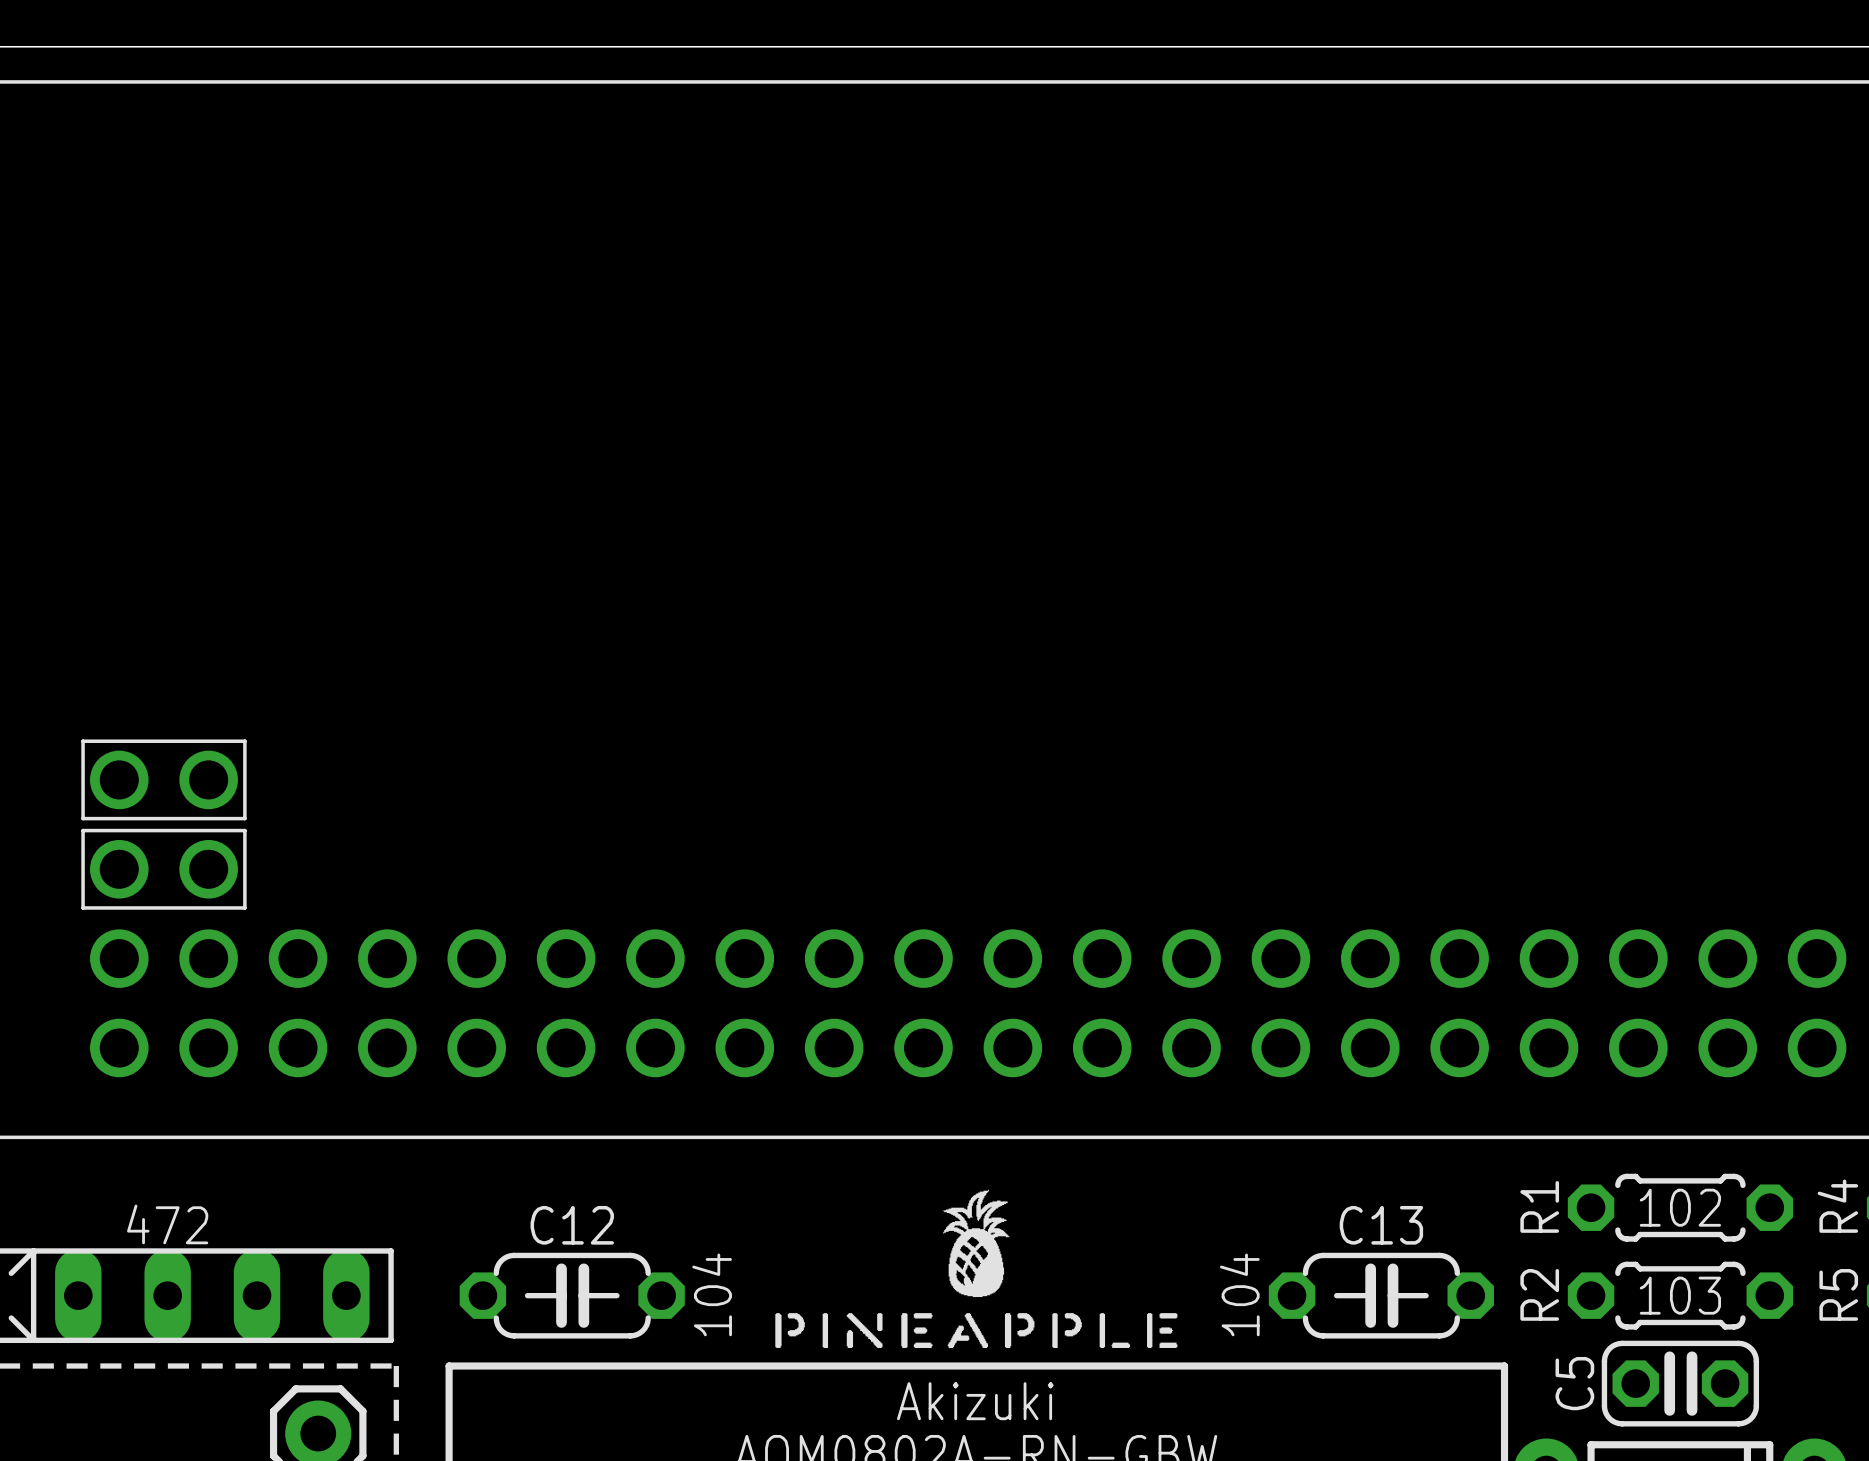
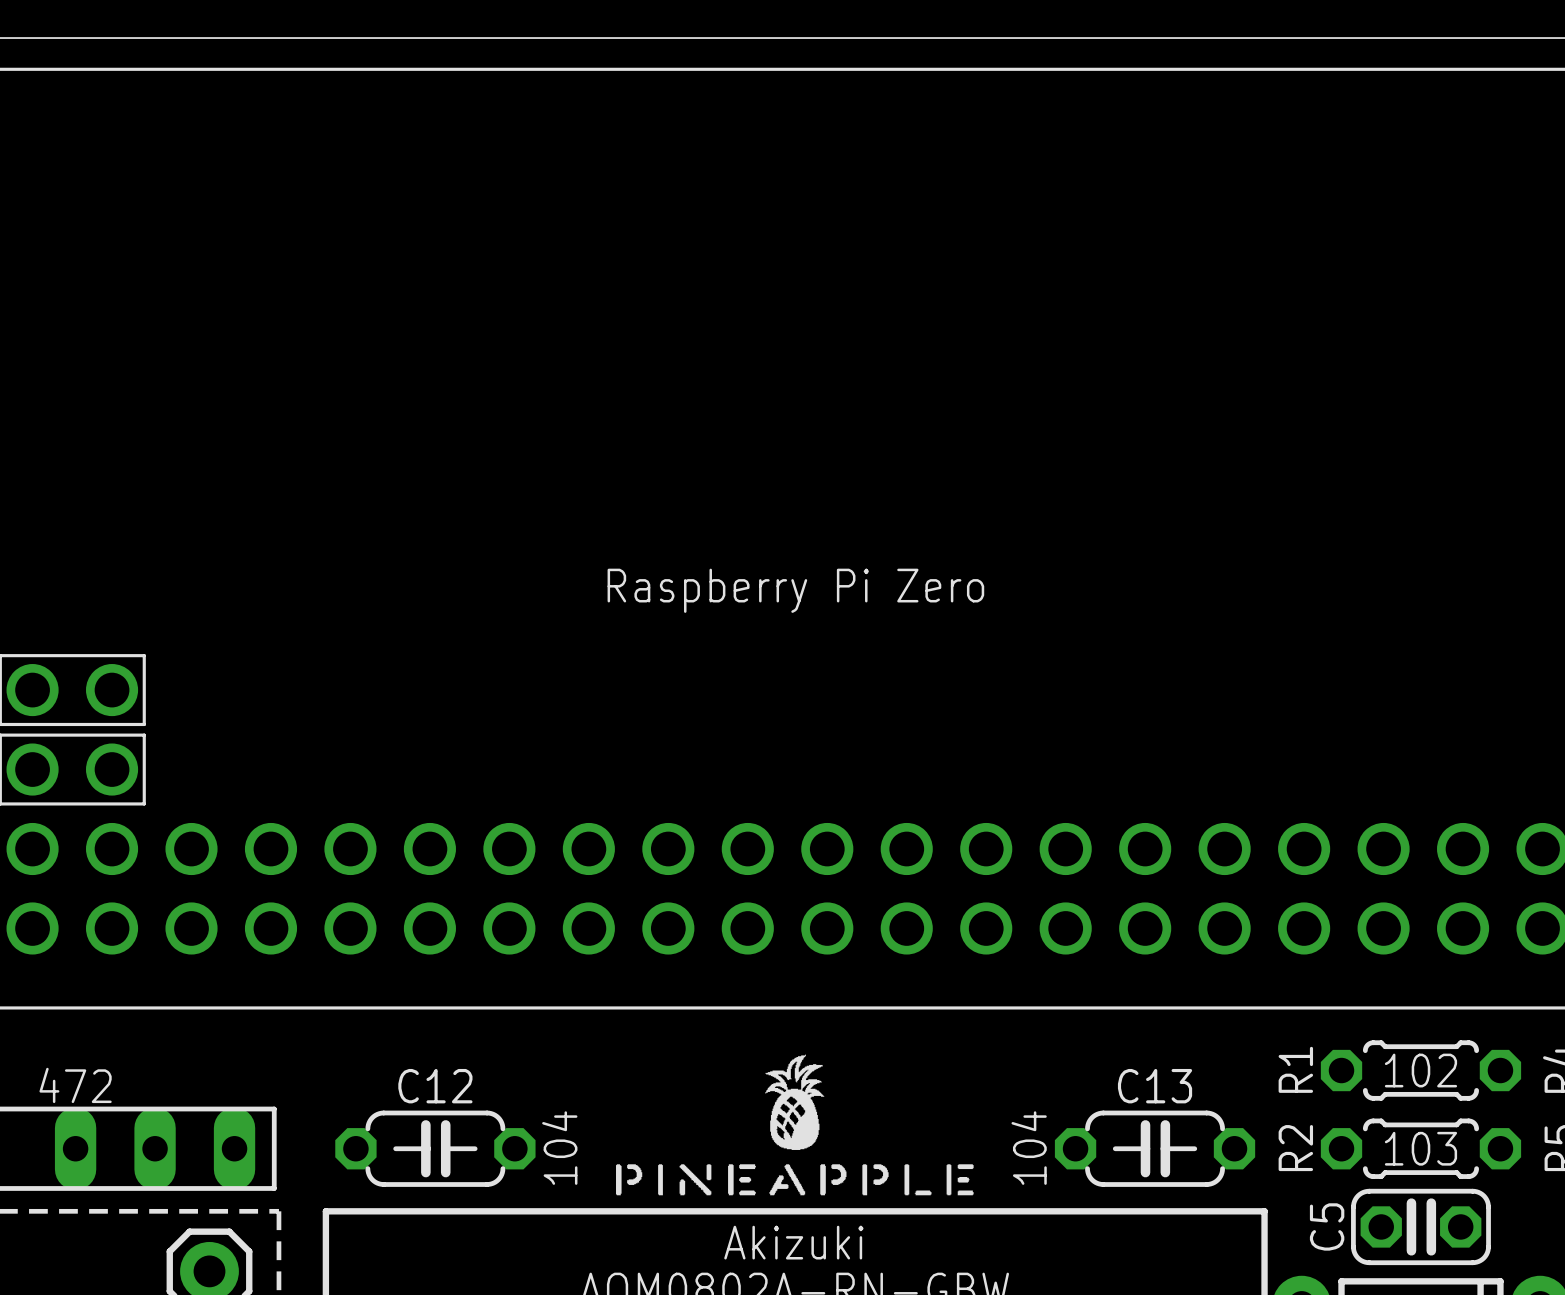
text: none -> Raspberry Pi Zero (795, 590)

